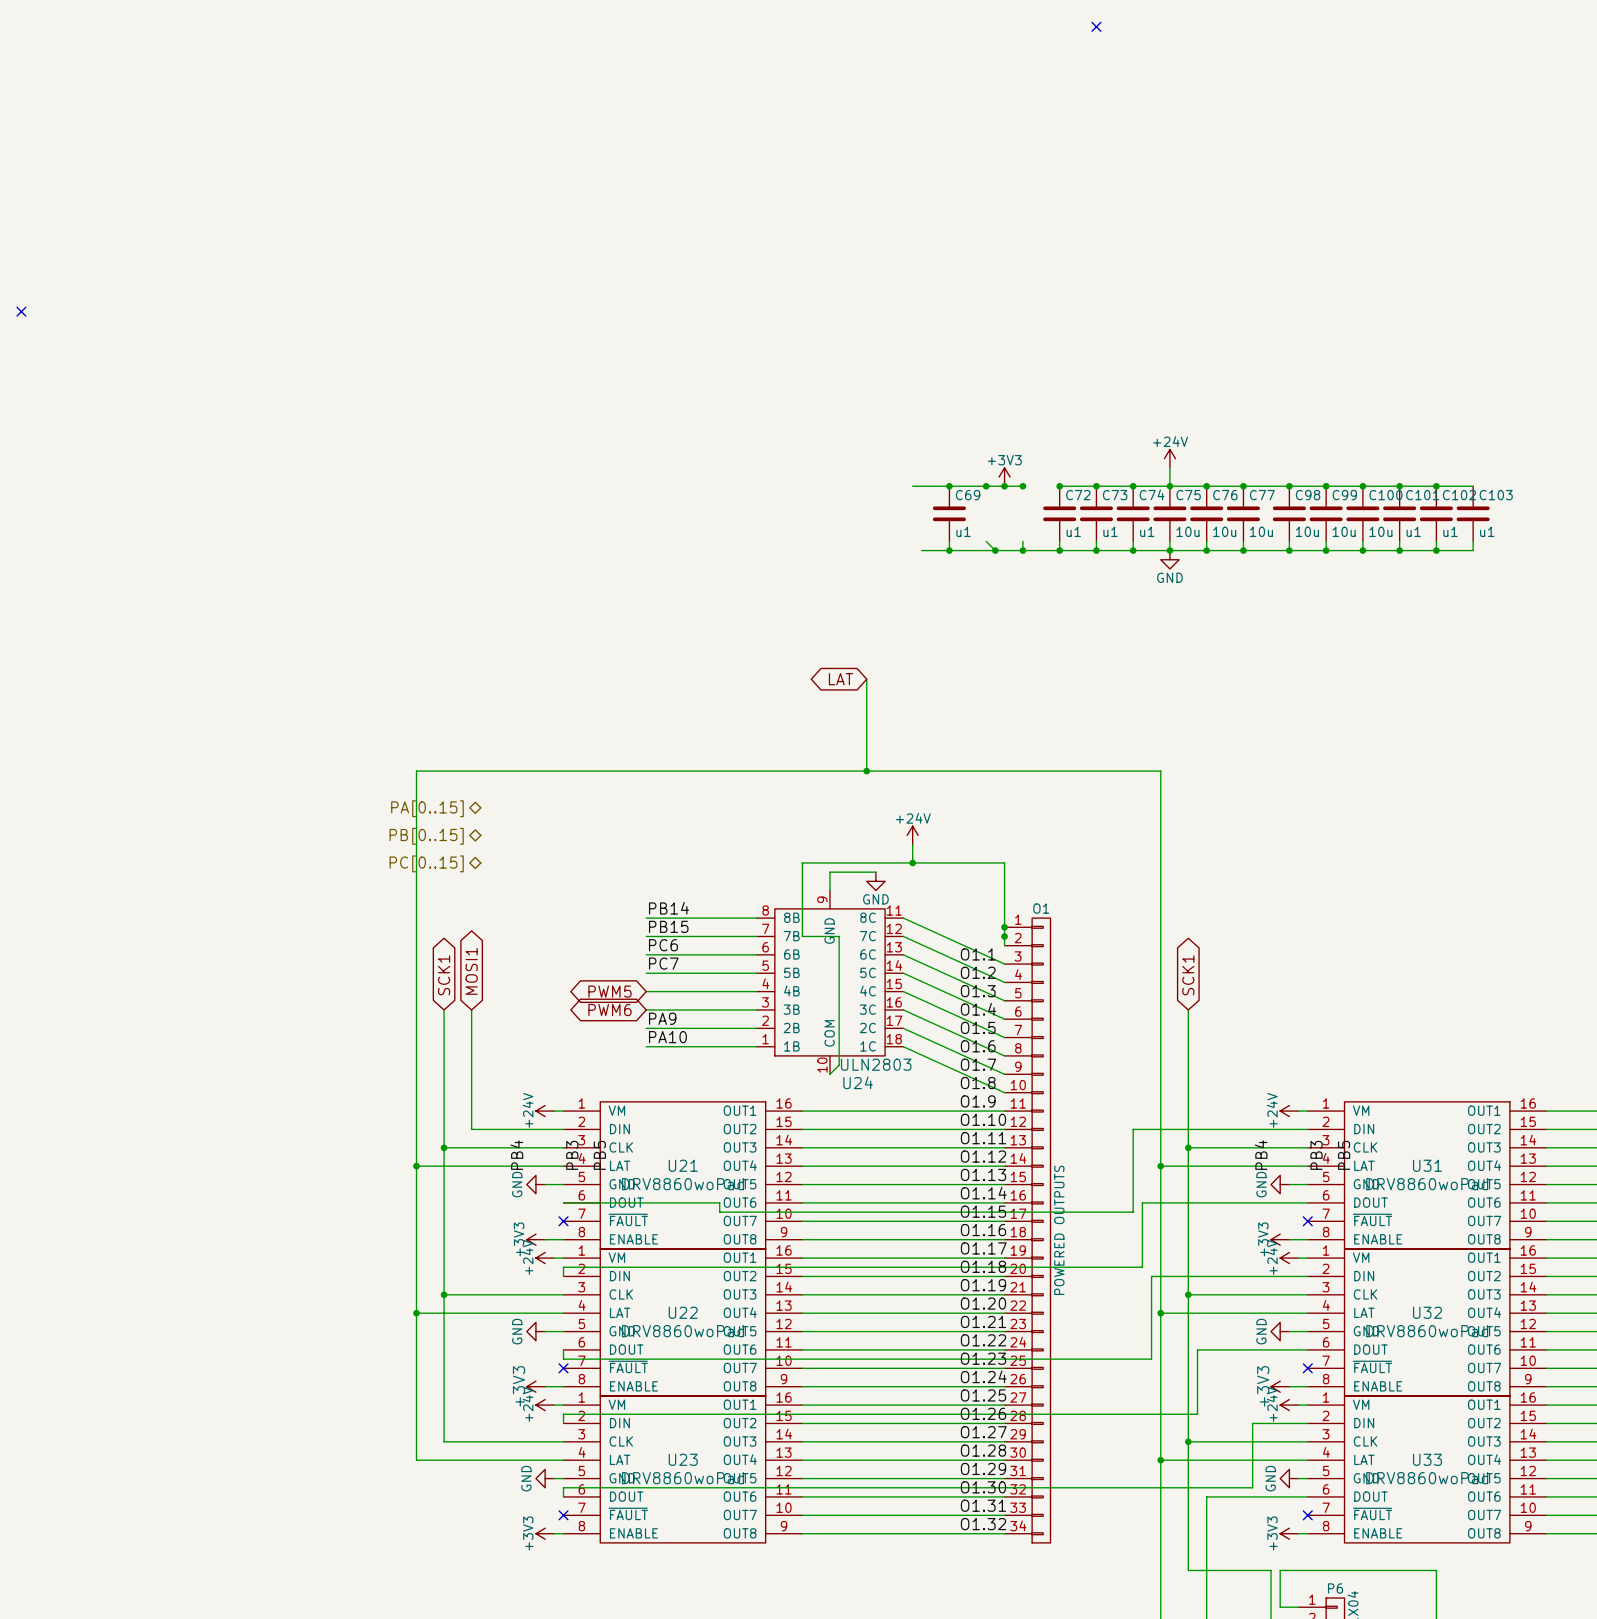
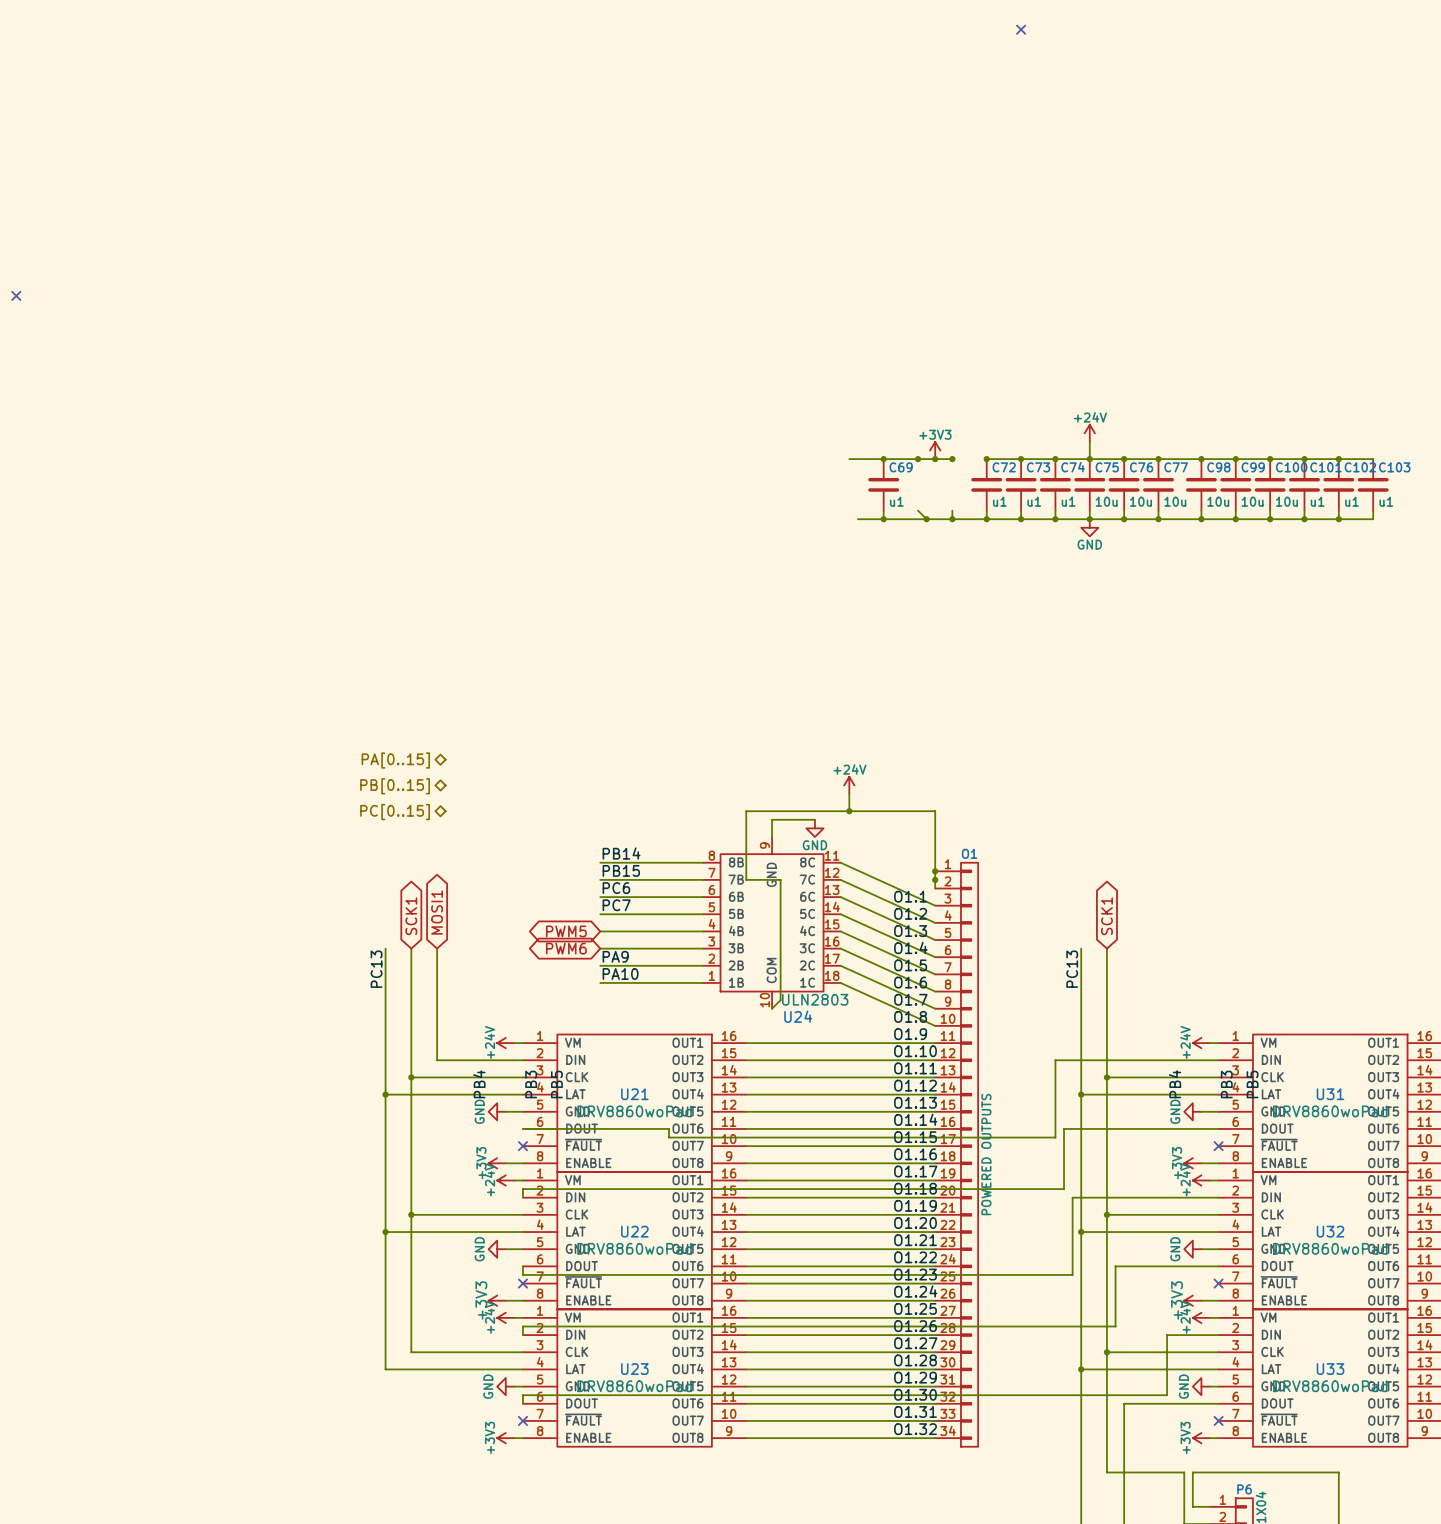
global label: LAT (841, 679) -> none
wire: (866, 679) (866, 771) -> none
junction: (866, 771) -> none
wire: (416, 1009) (416, 771) (1160, 771) (1160, 1009) -> none
label: none -> PC13 (376, 969)
label: none -> PC13 (1072, 969)

